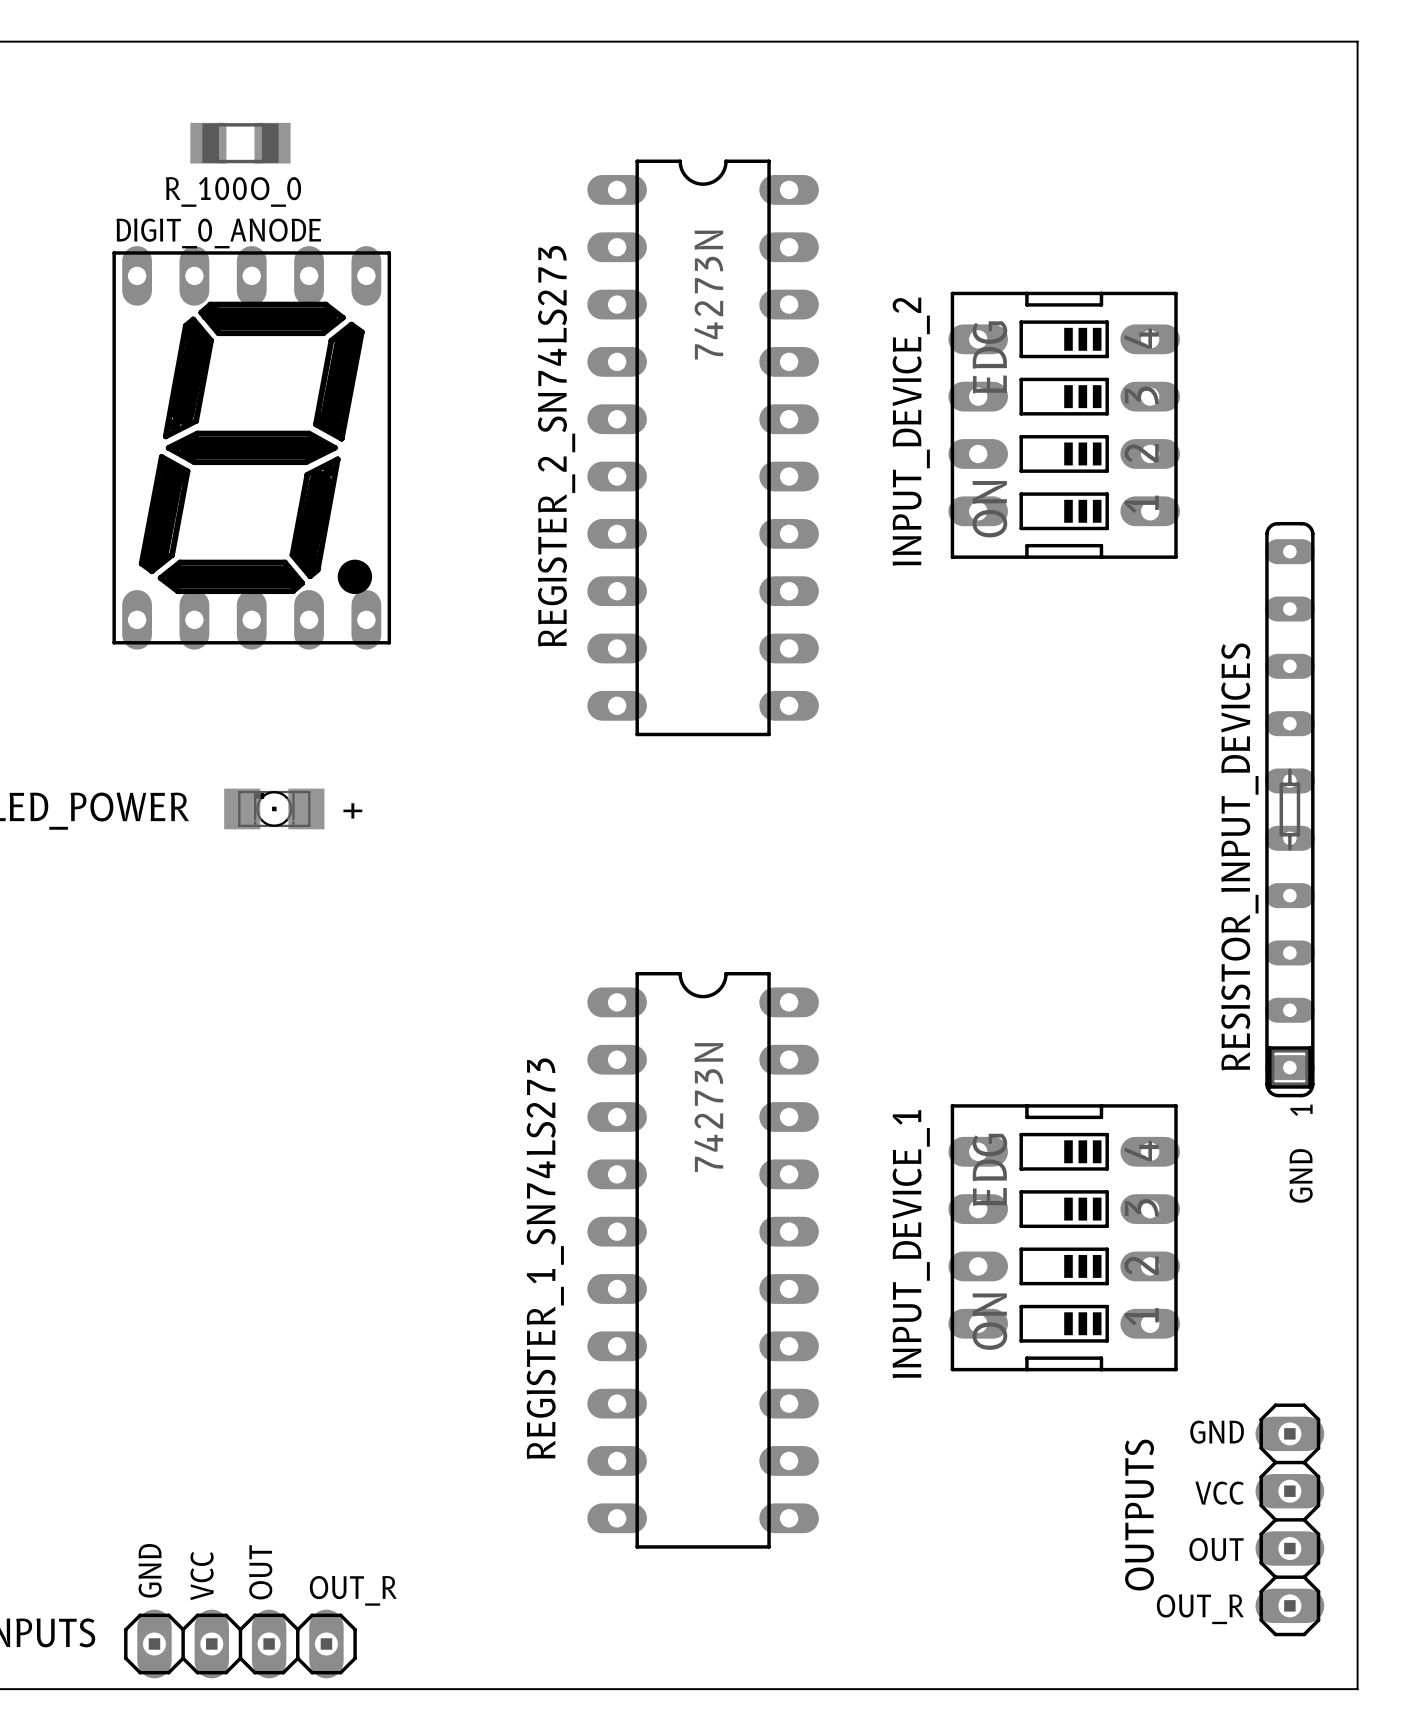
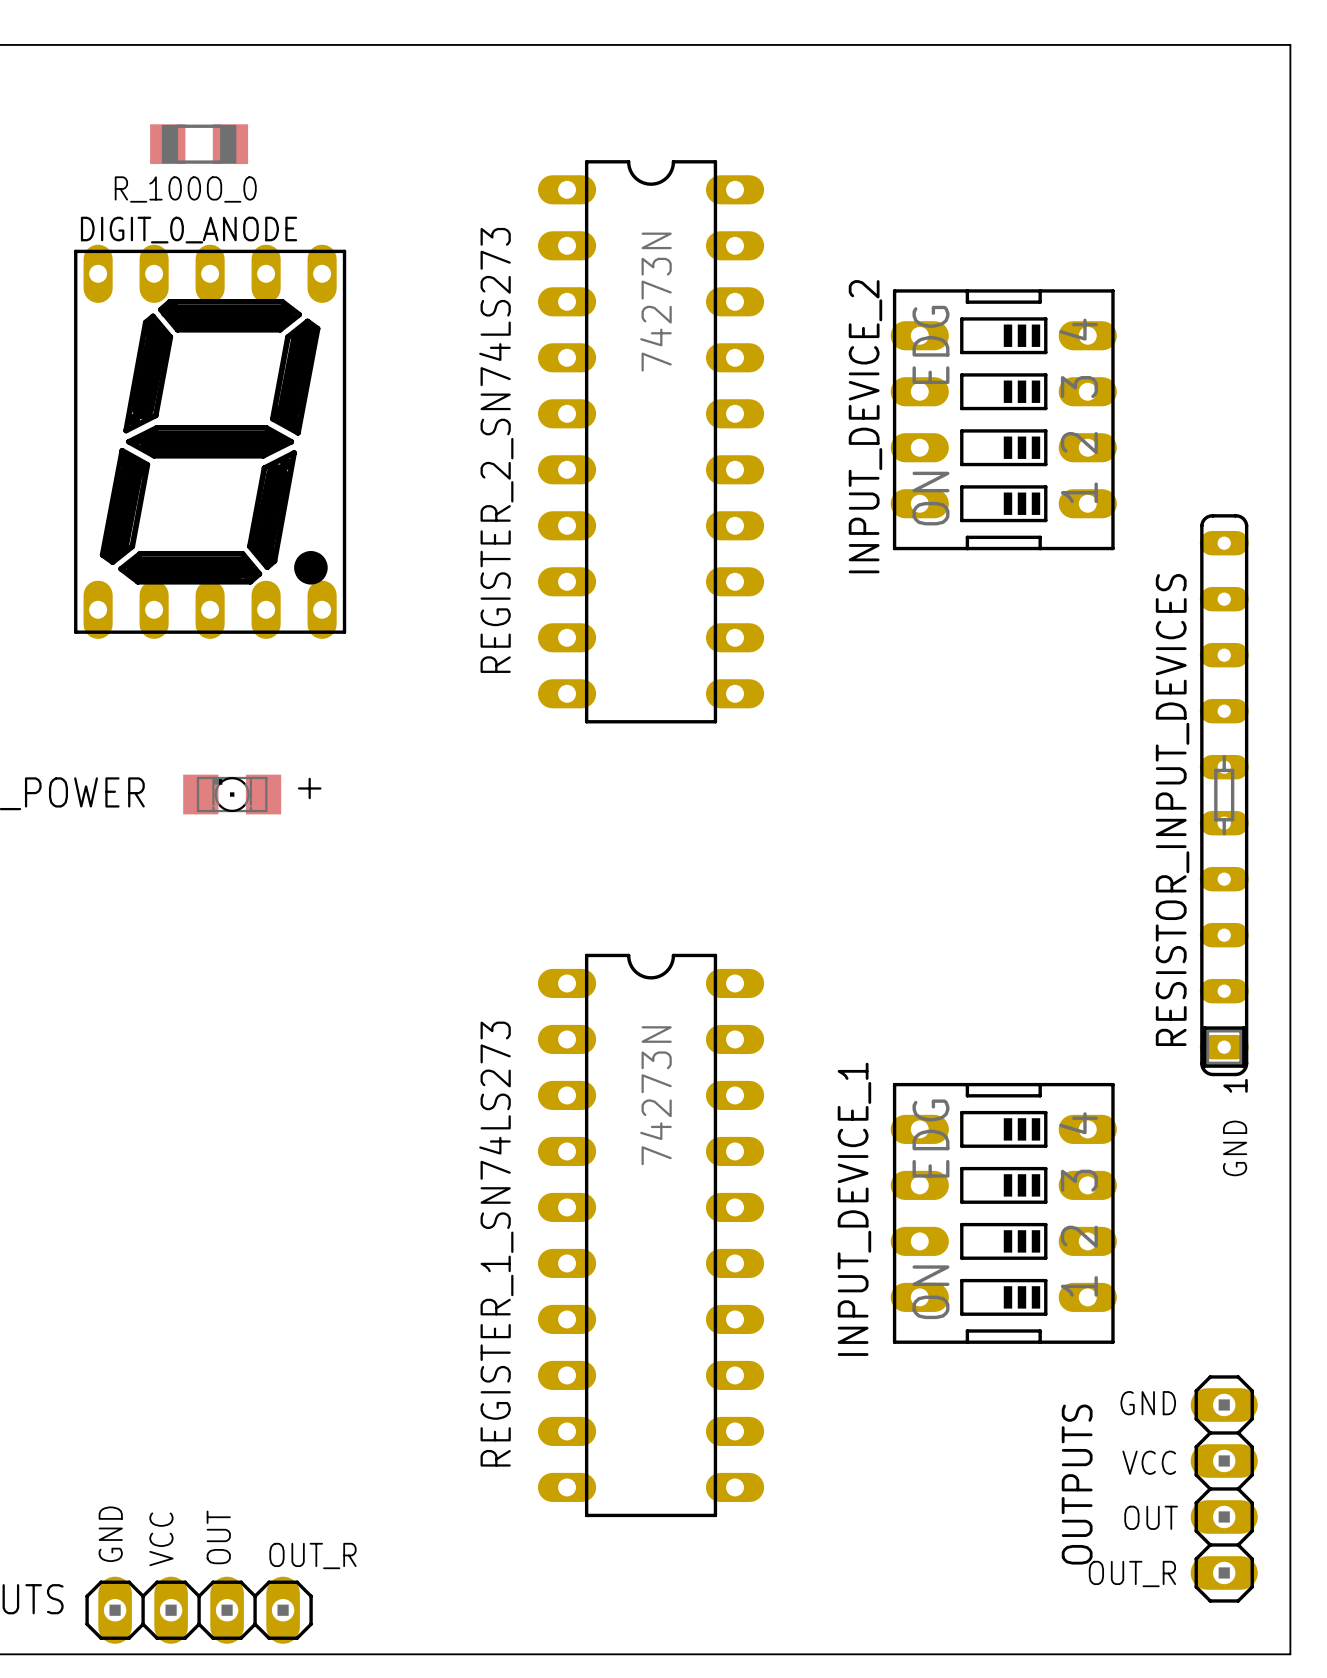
INPUT_DEVICE_2 name position: INPUT_DEVICE_2 (911, 431) -> INPUT_DEVICE_2 (865, 426)
REGISTER_2_SN74LS273 name position: REGISTER_2_SN74LS273 (556, 446) -> REGISTER_2_SN74LS273 (496, 450)
INPUT_DEVICE_1 name position: INPUT_DEVICE_1 (911, 1244) -> INPUT_DEVICE_1 (854, 1209)
REGISTER_1_SN74LS273 name position: REGISTER_1_SN74LS273 (545, 1258) -> REGISTER_1_SN74LS273 (496, 1244)

